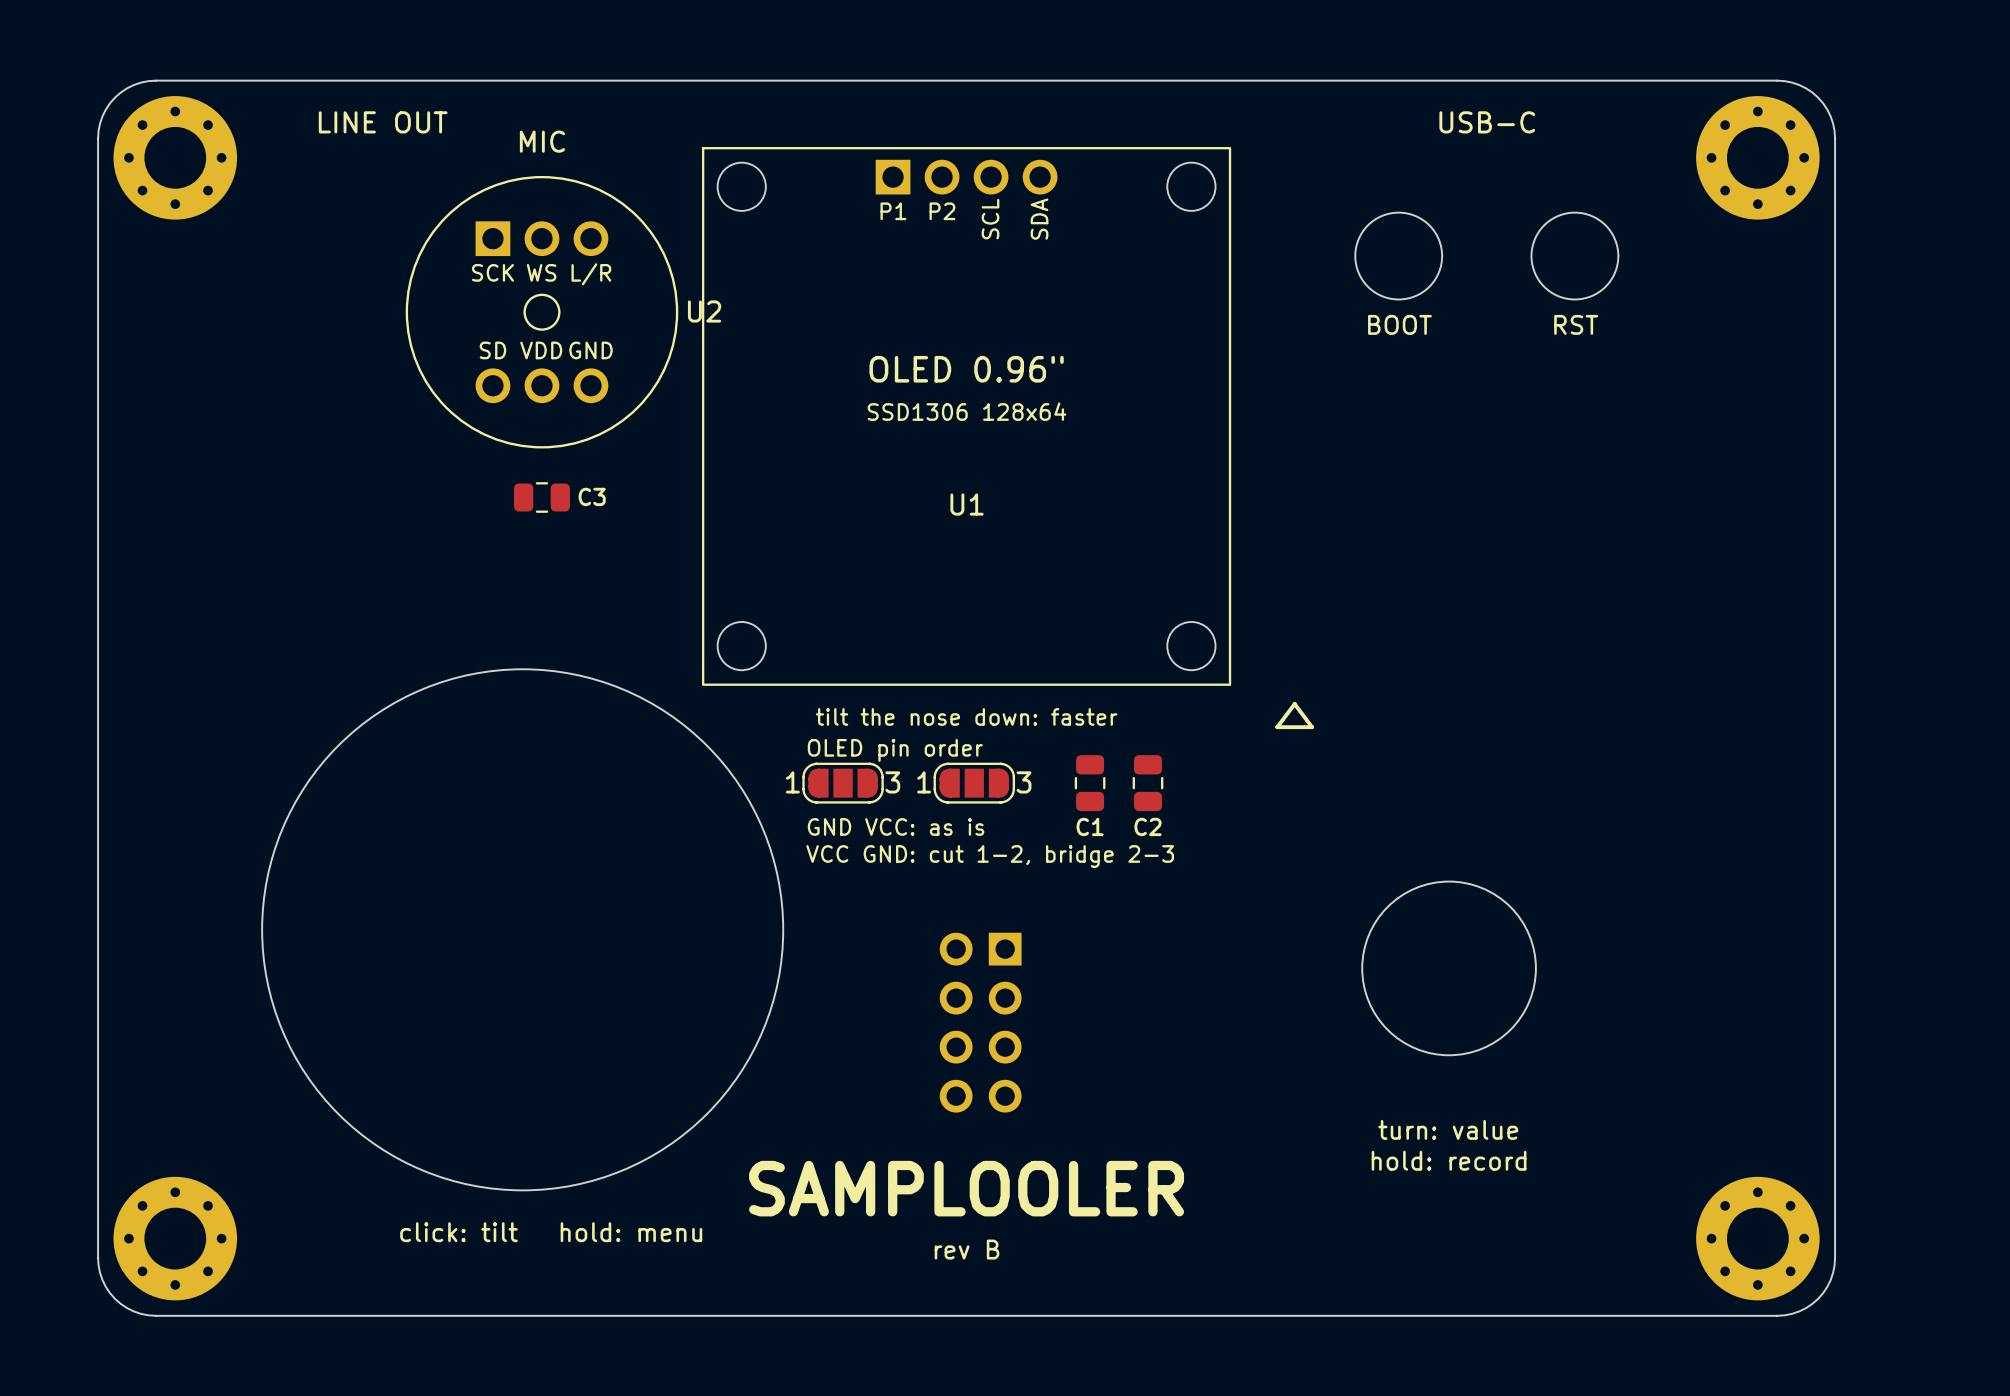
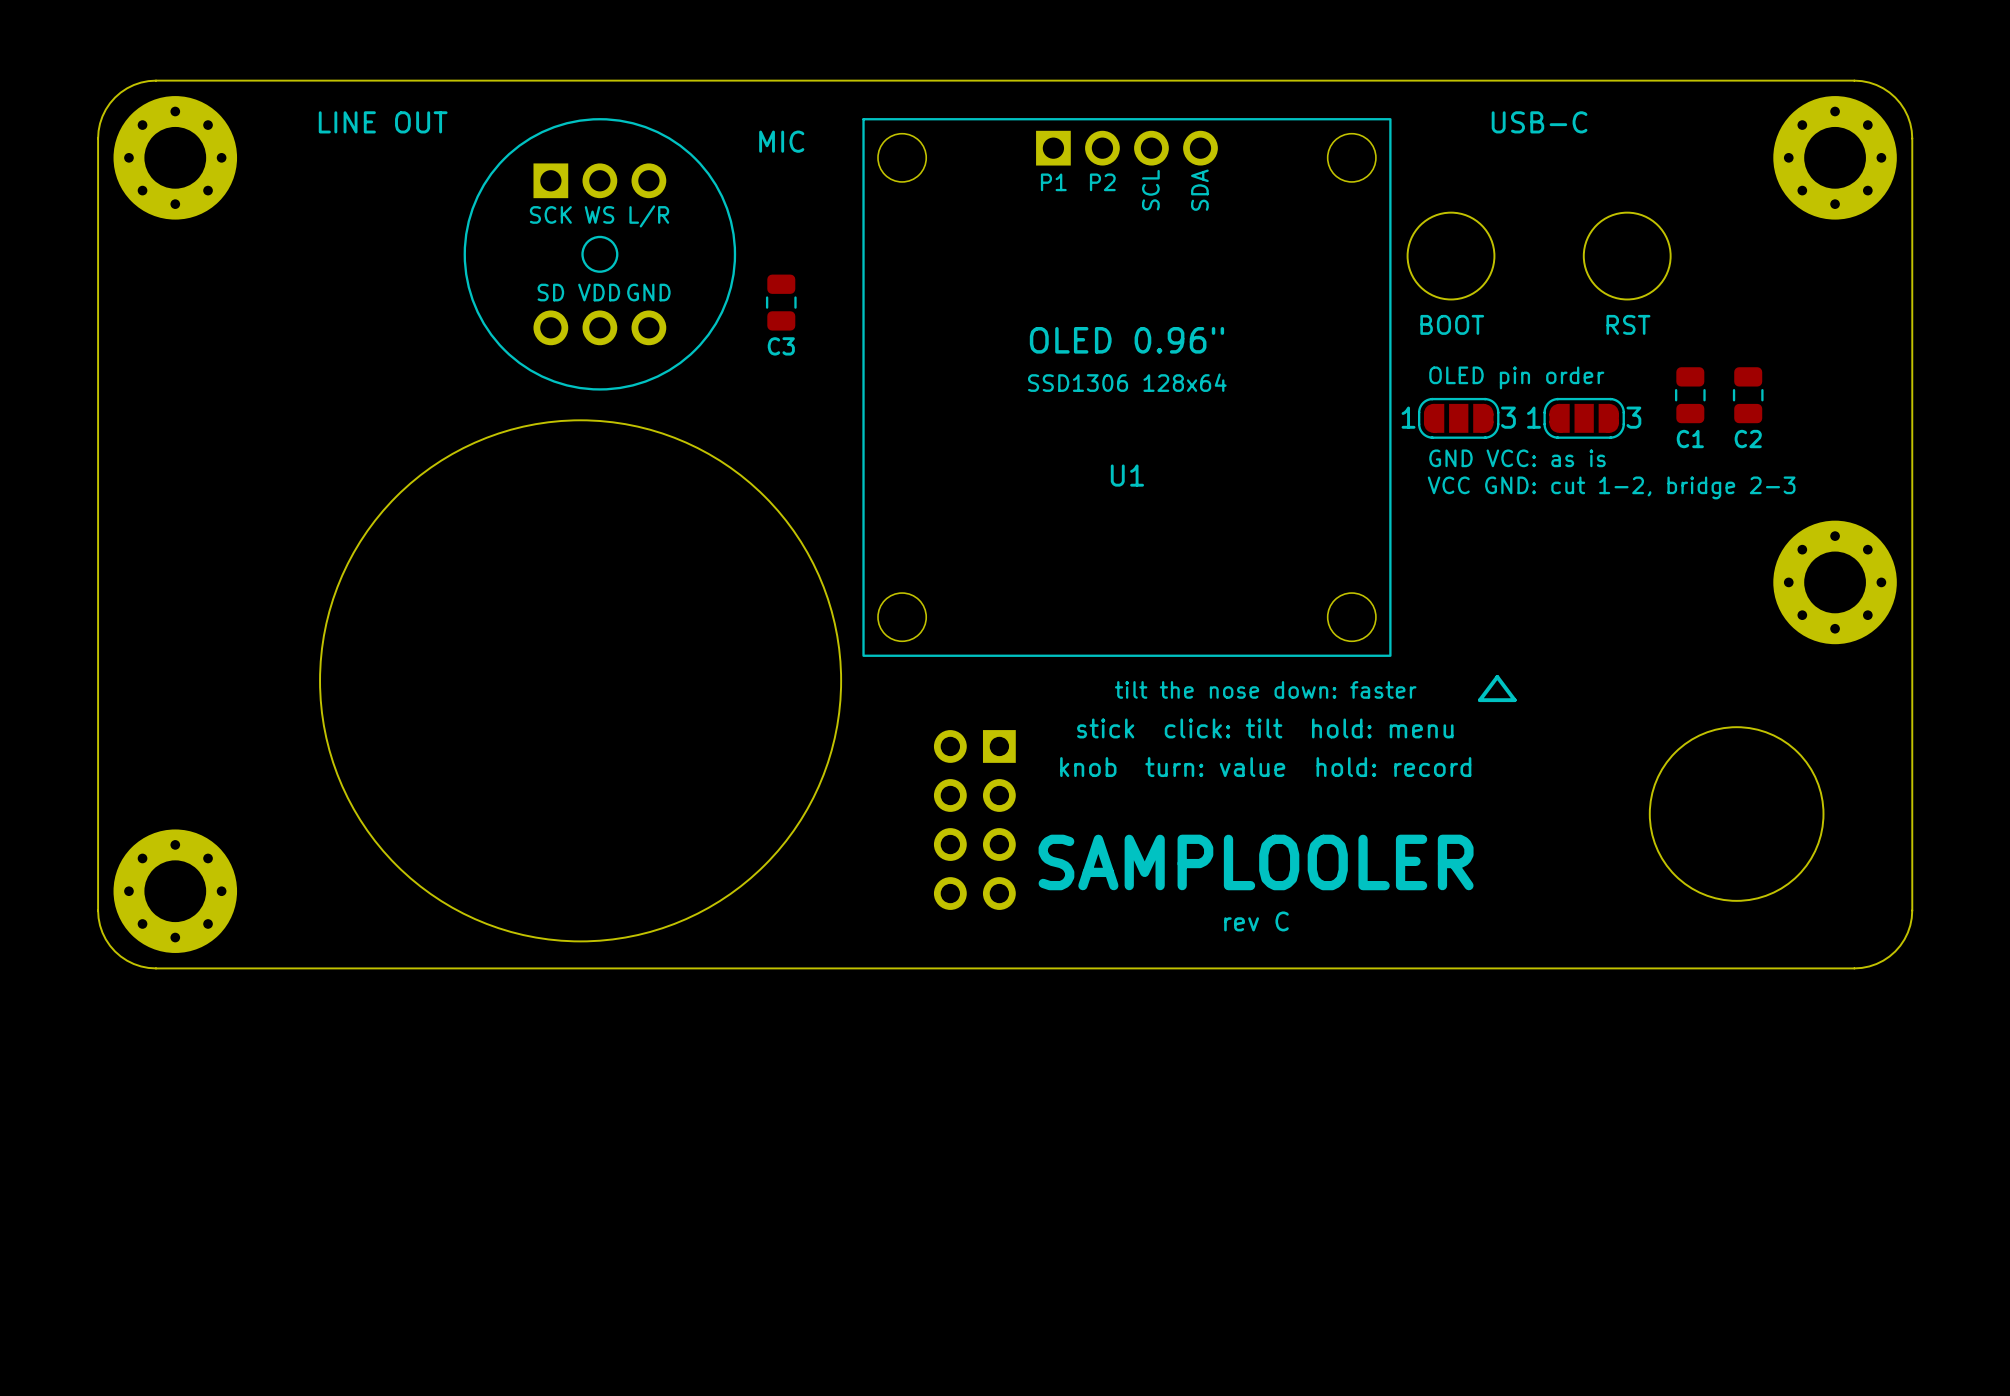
board edge: (1777, 80) (1799, 85) (1818, 97) (1830, 116) (1835, 138) (1835, 1257) (1833, 1272) (1827, 1286) (1818, 1298) (1806, 1308) (1792, 1313) (1777, 1315) (155, 1315) (141, 1313) (127, 1308) (110, 1293) (102, 1280) (98, 1265) (98, 910) -> (1777, 80) (1854, 80) (1876, 85) (1889, 92) (1900, 103) (1907, 116) (1911, 130) (1912, 910) (1910, 925) (1904, 939) (1895, 951) (1883, 960) (1869, 966) (1854, 968) (155, 968) (133, 964) (115, 951) (102, 932) (98, 910)
text position: USB-C (1487, 122) -> USB-C (1539, 122)
text position: MIC (542, 141) -> MIC (781, 141)
part position: (1757, 157) -> (1835, 157)
part: none -> (599, 254)
round board edge position: (1398, 256) -> (1451, 256)
round board edge position: (1574, 256) -> (1627, 256)
U2: (541, 312) -> none
text position: BOOT (1399, 324) -> BOOT (1452, 324)
text position: RST (1576, 324) -> RST (1628, 324)
text: none -> OLED pin order (1516, 377)
U1 position: (966, 416) -> (1126, 387)
part: none -> (1458, 418)
part: none -> (1584, 418)
text: none -> GND VCC: as is (1517, 458)
text: none -> VCC GND: cut 1-2, bridge 2-3 (1611, 487)
C3 rotation: 0° (541, 497) -> 90° clockwise (781, 302)
C3 position: (541, 497) -> (781, 302)
part: none -> (1835, 582)
line: (1294, 704) (1277, 727) (1312, 727) (1294, 704) -> (1497, 676) (1479, 700) (1514, 700) (1497, 676)
text position: tilt the nose down: faster (966, 716) -> tilt the nose down: faster (1265, 689)
text: none -> stick click: tilt hold: menu (1265, 728)
text: OLED pin order (895, 750) -> none
text: none -> knob turn: value hold: record (1265, 767)
part: (843, 783) -> none
part: (974, 783) -> none
C1 position: (1090, 783) -> (1690, 395)
C2 position: (1147, 783) -> (1748, 395)
text: GND VCC: as is (896, 826) -> none
text: VCC GND: cut 1-2, bridge 2-3 (990, 856) -> none
text: none -> rev C (1256, 921)
round board edge position: (522, 929) -> (580, 680)
round board edge position: (1449, 968) -> (1736, 814)
part position: (980, 1022) -> (974, 820)
text: turn: value (1448, 1129) -> none
text: hold: record (1449, 1160) -> none
text position: SAMPLOOLER (966, 1188) -> SAMPLOOLER (1256, 862)
text: click: tilt hold: menu (551, 1232) -> none
part position: (175, 1238) -> (175, 891)
part: (1757, 1238) -> none
text: rev B (966, 1249) -> none

